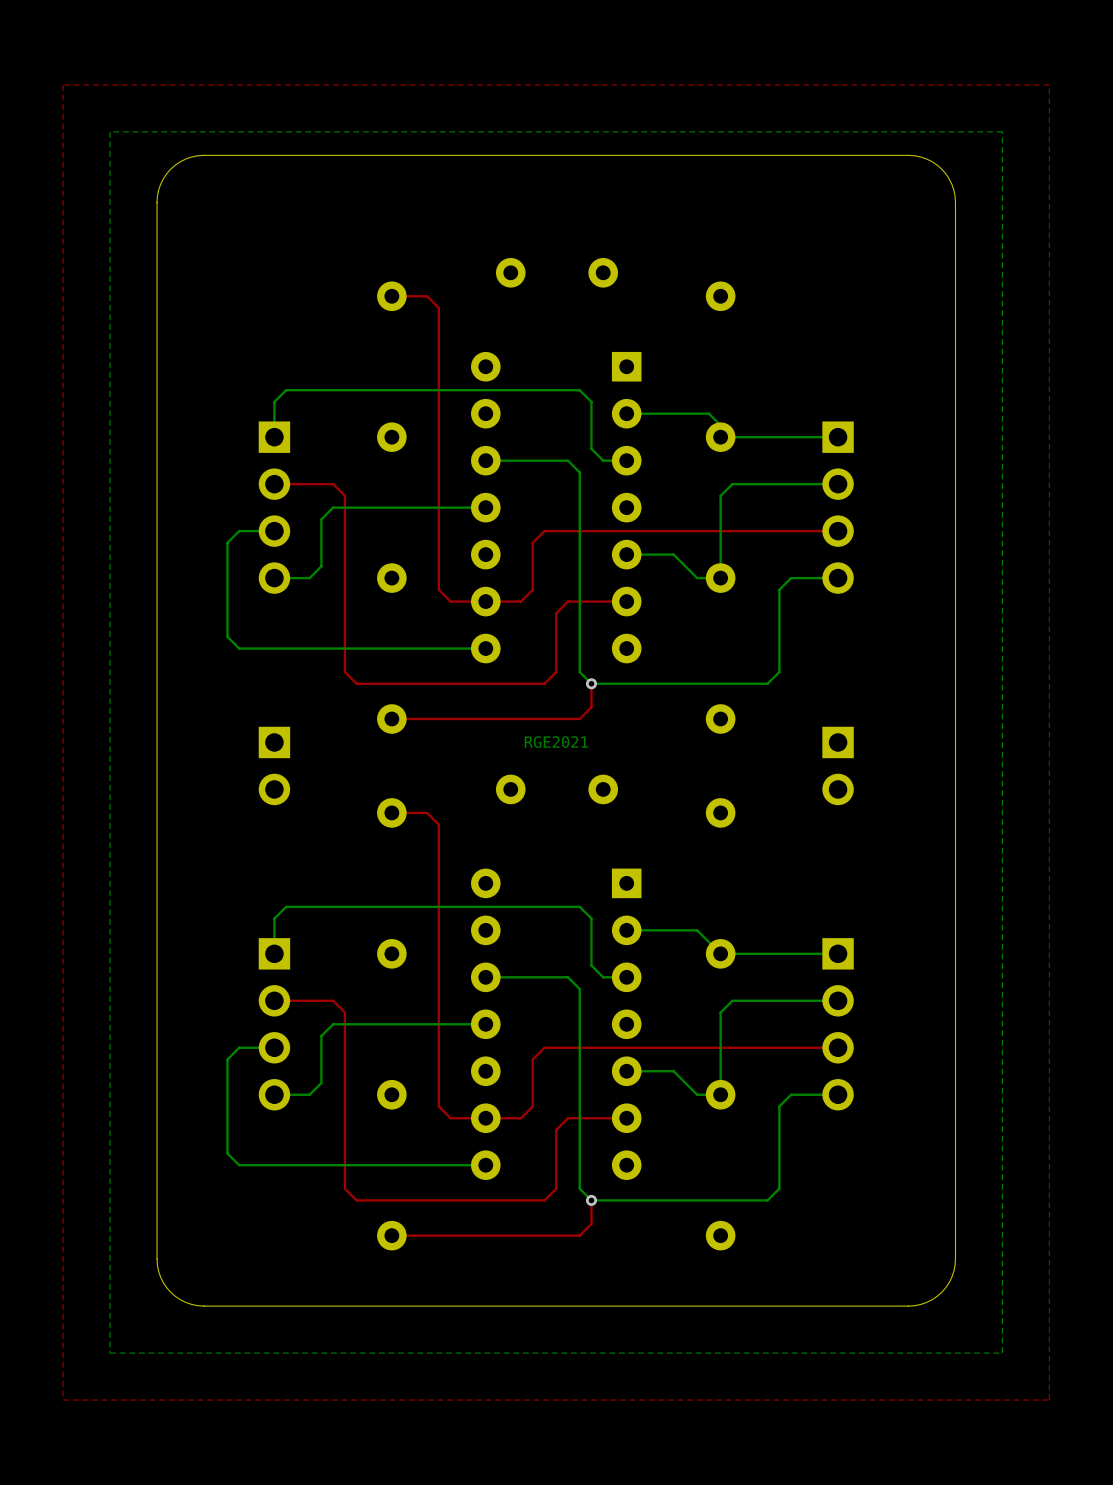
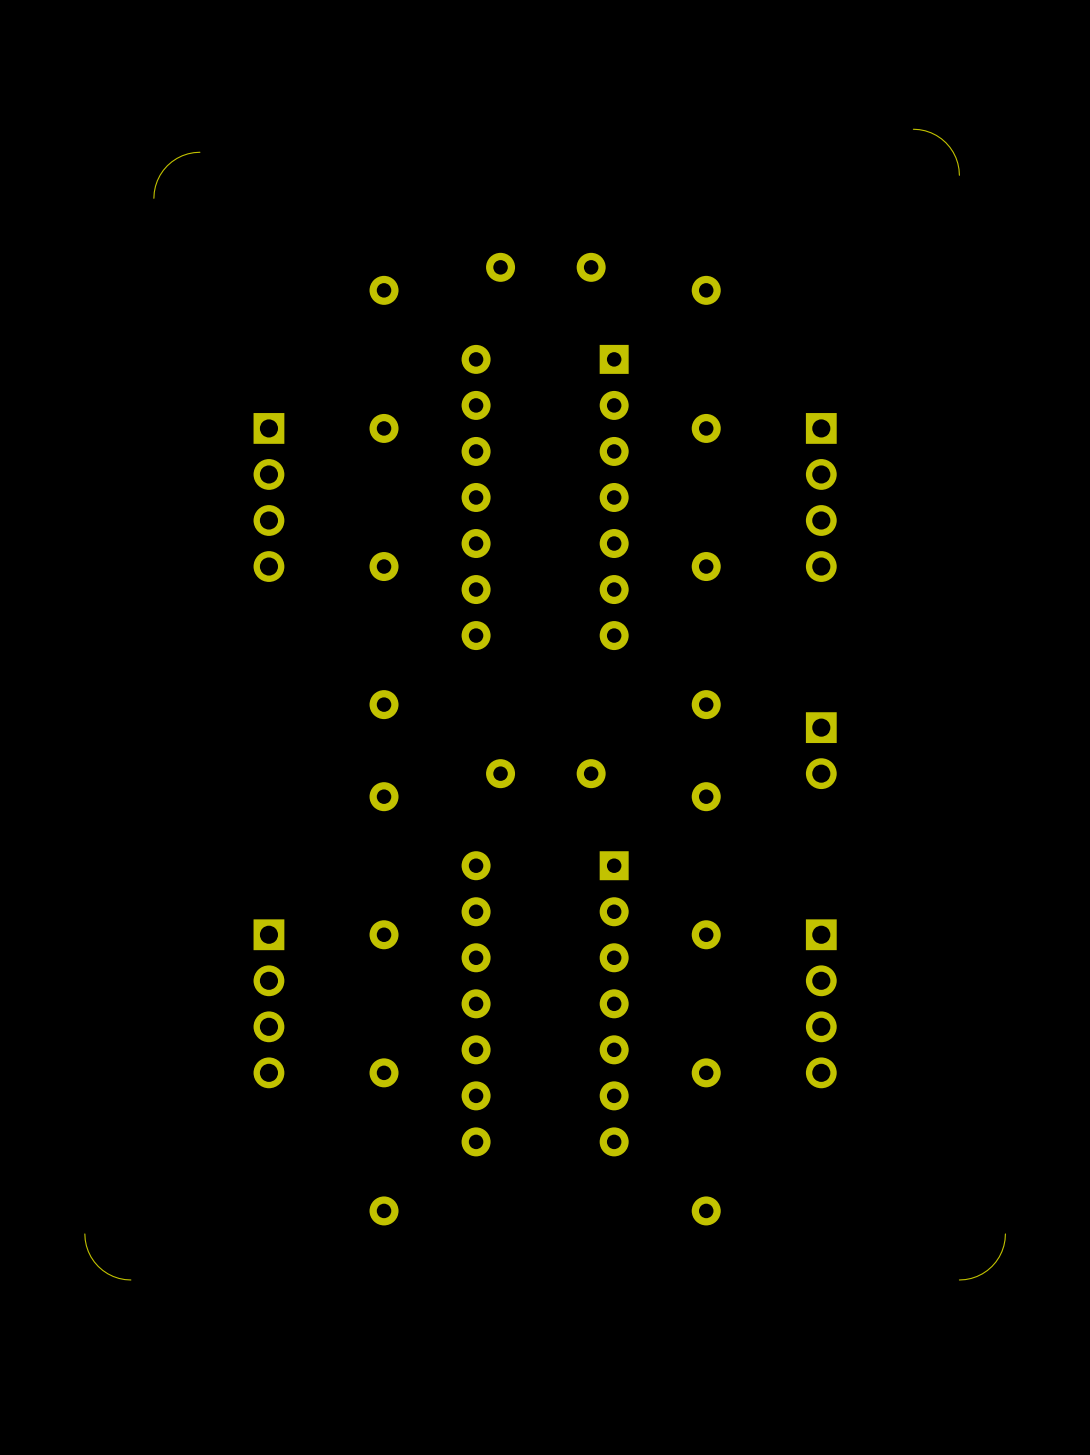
top zone outline: (1049, 84) (1049, 1400) (63, 1400) (63, 84) (1049, 84) -> none
board edge: none -> (913, 129) (930, 132) (945, 142) (955, 157) (959, 175)
bottom zone outline: (1002, 131) (1002, 1353) (110, 1353) (110, 131) (1002, 131) -> none
board edge: (203, 155) (908, 155) (920, 156) (932, 161) (941, 169) (949, 178) (953, 190) (955, 202) (955, 1259) (951, 1277) (945, 1287) (937, 1296) (920, 1304) (908, 1306) (203, 1306) (186, 1302) (175, 1296) (166, 1287) (158, 1271) (157, 1259) (157, 202) -> none
top track: (391, 296) (427, 296) (438, 308) (438, 589) (450, 601) (521, 601) (532, 589) (532, 542) (544, 531) (838, 531) -> none
bottom track: (626, 413) (708, 413) (720, 425) (720, 437) (838, 437) -> none
bottom track: (274, 437) (274, 401) (286, 390) (579, 390) (591, 401) (591, 448) (603, 460) (626, 460) -> none
bottom track: (485, 460) (567, 460) (579, 472) (579, 672) (591, 683) (767, 683) (779, 672) (779, 589) (791, 578) (838, 578) -> none
top track: (274, 484) (333, 484) (344, 495) (344, 672) (356, 683) (544, 683) (556, 672) (556, 613) (567, 601) (626, 601) -> none
bottom track: (838, 484) (732, 484) (720, 495) (720, 578) (697, 578) (673, 554) (626, 554) -> none
bottom track: (485, 507) (333, 507) (321, 519) (321, 566) (309, 578) (274, 578) -> none
bottom track: (274, 531) (239, 531) (227, 542) (227, 636) (239, 648) (485, 648) -> none
top track: (591, 683) (591, 707) (579, 718) (391, 718) -> none
via: (591, 683) -> none
text: RGE2021 (556, 742) -> none
part: (274, 765) -> none
top track: (391, 812) (427, 812) (438, 824) (438, 1106) (450, 1118) (521, 1118) (532, 1106) (532, 1059) (544, 1047) (838, 1047) -> none
bottom track: (626, 930) (697, 930) (720, 953) (838, 953) -> none
bottom track: (274, 953) (274, 918) (286, 906) (579, 906) (591, 918) (591, 965) (603, 977) (626, 977) -> none
bottom track: (485, 977) (567, 977) (579, 989) (579, 1188) (591, 1200) (767, 1200) (779, 1188) (779, 1106) (791, 1094) (838, 1094) -> none
top track: (274, 1000) (333, 1000) (344, 1012) (344, 1188) (356, 1200) (544, 1200) (556, 1188) (556, 1129) (567, 1118) (626, 1118) -> none
bottom track: (838, 1000) (732, 1000) (720, 1012) (720, 1094) (697, 1094) (673, 1071) (626, 1071) -> none
bottom track: (485, 1024) (333, 1024) (321, 1036) (321, 1083) (309, 1094) (274, 1094) -> none
bottom track: (274, 1047) (239, 1047) (227, 1059) (227, 1153) (239, 1165) (485, 1165) -> none
top track: (591, 1200) (591, 1223) (579, 1235) (391, 1235) -> none
via: (591, 1200) -> none
board edge: none -> (84, 1233) (88, 1251) (98, 1266) (113, 1276) (130, 1279)
board edge: none -> (1005, 1233) (1001, 1251) (991, 1266) (977, 1276) (959, 1279)

